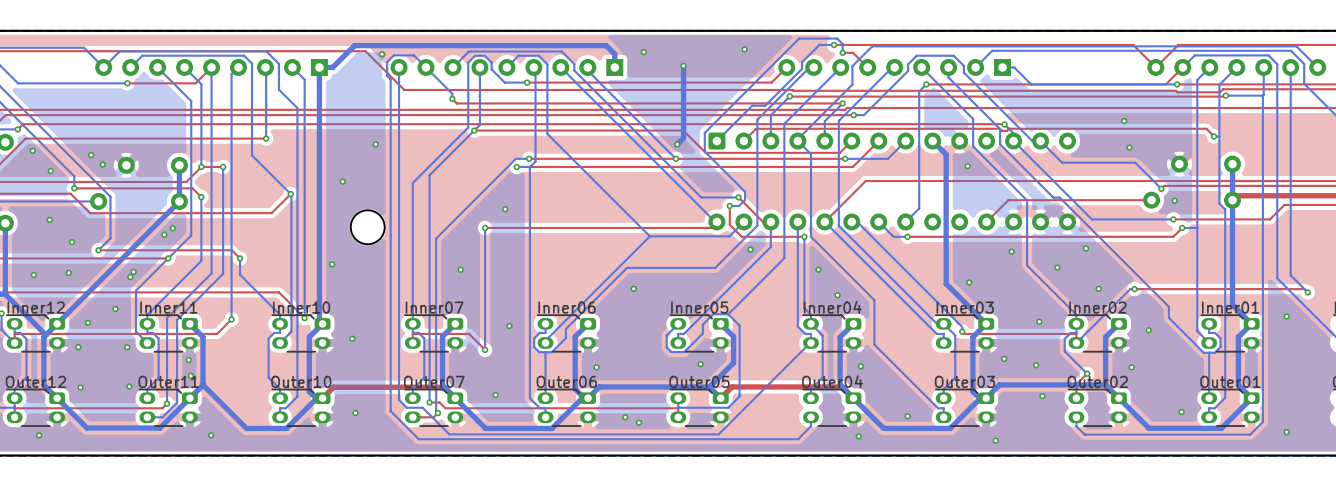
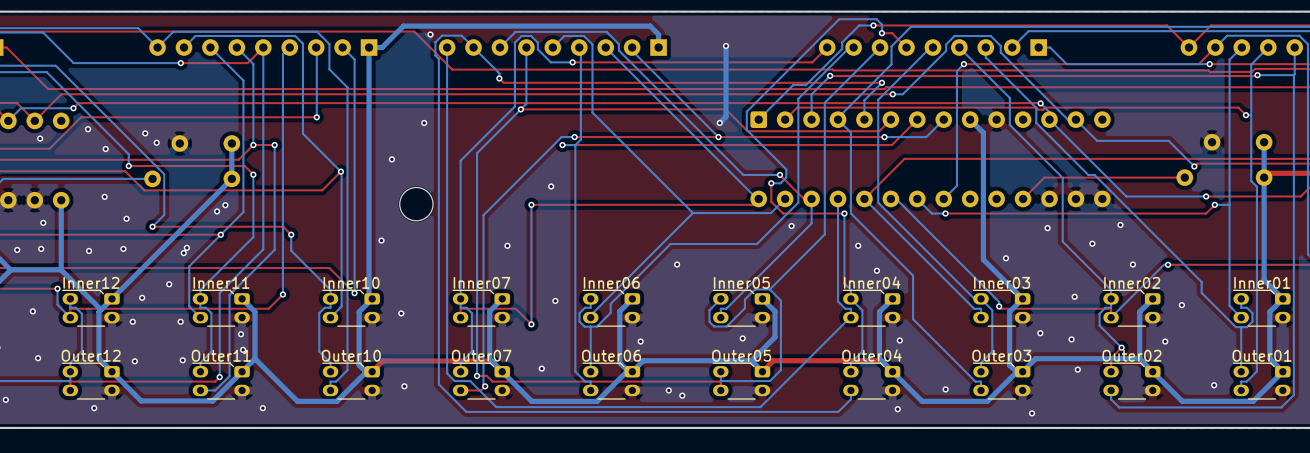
via: (744, 49) -> none
via: (643, 52) -> none
via: (1124, 121) -> none
via: (1129, 147) -> none
via: (967, 166) -> none
via: (1174, 200) -> none

